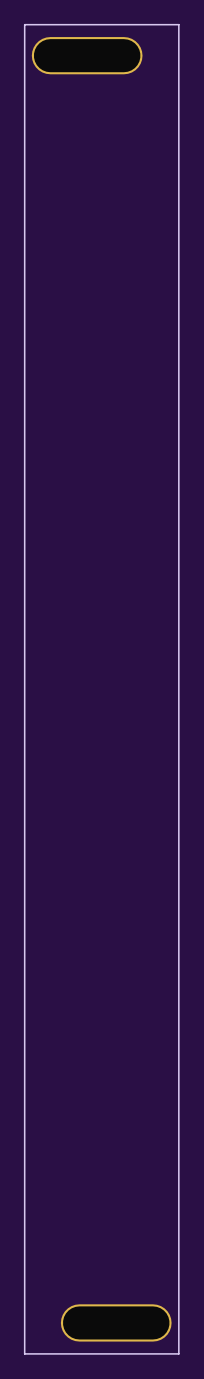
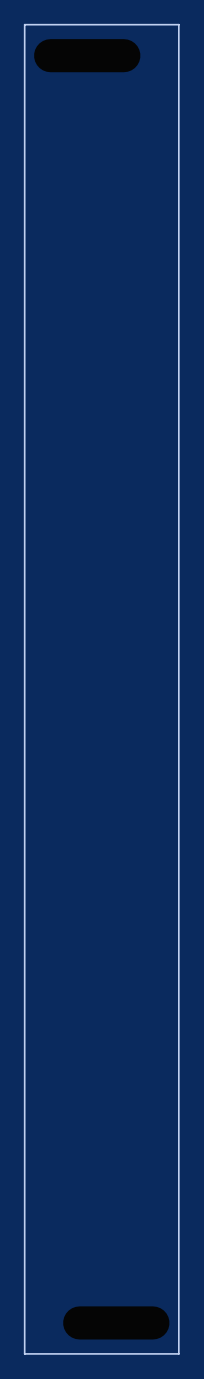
part footprint: [31, 37, 143, 75] -> [34, 39, 141, 73]
part footprint: [60, 1304, 172, 1342] -> [63, 1306, 170, 1340]

